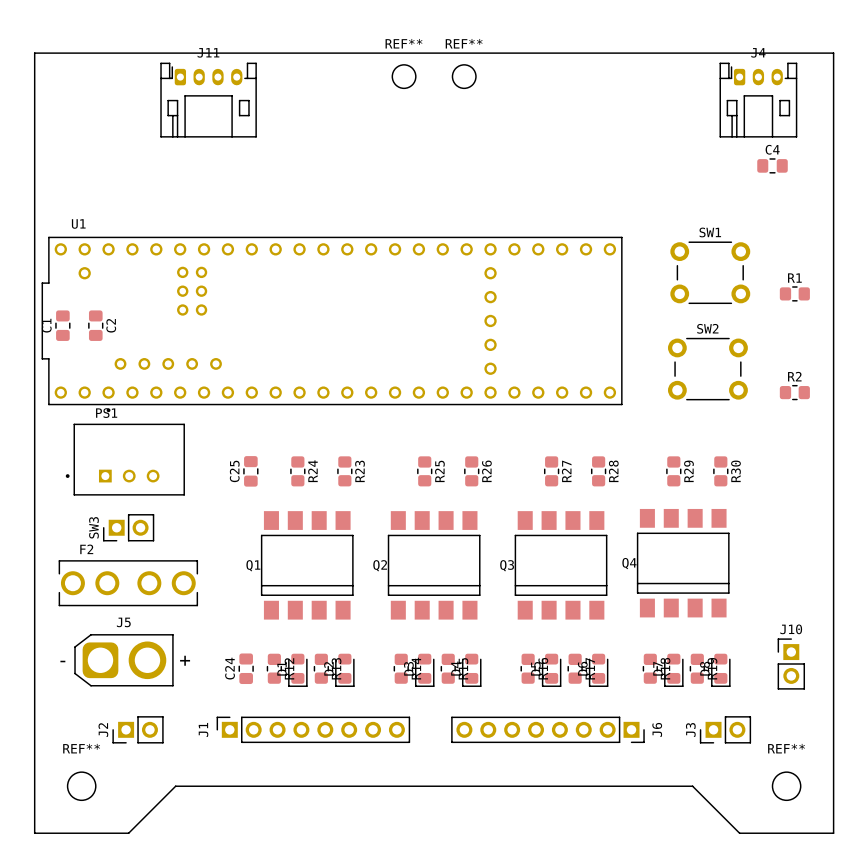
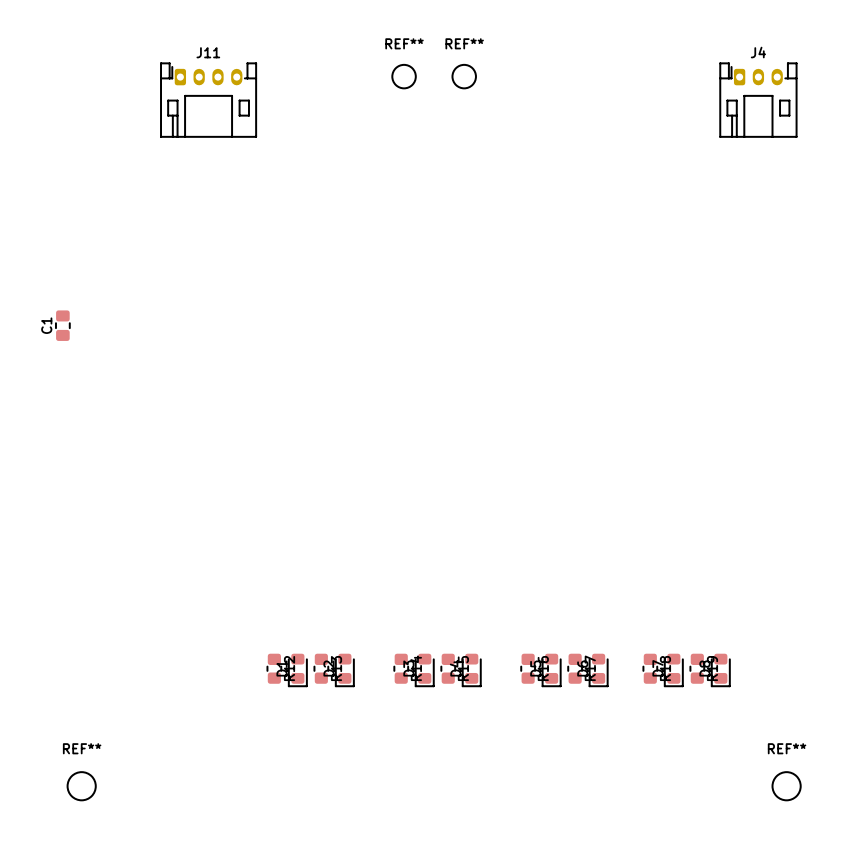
board edge: (34, 53) (34, 833) (128, 833) (175, 786) (692, 786) (739, 833) (833, 833) (833, 53) (34, 53) -> none
C4: (772, 165) -> none
SW1: (710, 272) -> none
R1: (794, 293) -> none
U1: (332, 324) -> none
C2: (95, 325) -> none
SW2: (707, 369) -> none
R2: (794, 392) -> none
PS1: (125, 459) -> none
C25: (250, 471) -> none
R24: (297, 471) -> none
R23: (344, 471) -> none
R25: (424, 471) -> none
R26: (471, 471) -> none
R27: (551, 471) -> none
R28: (598, 471) -> none
R29: (673, 471) -> none
R30: (720, 471) -> none
SW3: (128, 527) -> none
Q4: (683, 563) -> none
Q1: (307, 565) -> none
Q2: (434, 565) -> none
Q3: (561, 565) -> none
F2: (128, 583) -> none
J5: (123, 660) -> none
J10: (791, 663) -> none
C24: (246, 668) -> none
J2: (138, 729) -> none
J1: (313, 729) -> none
J6: (547, 729) -> none
J3: (725, 729) -> none

